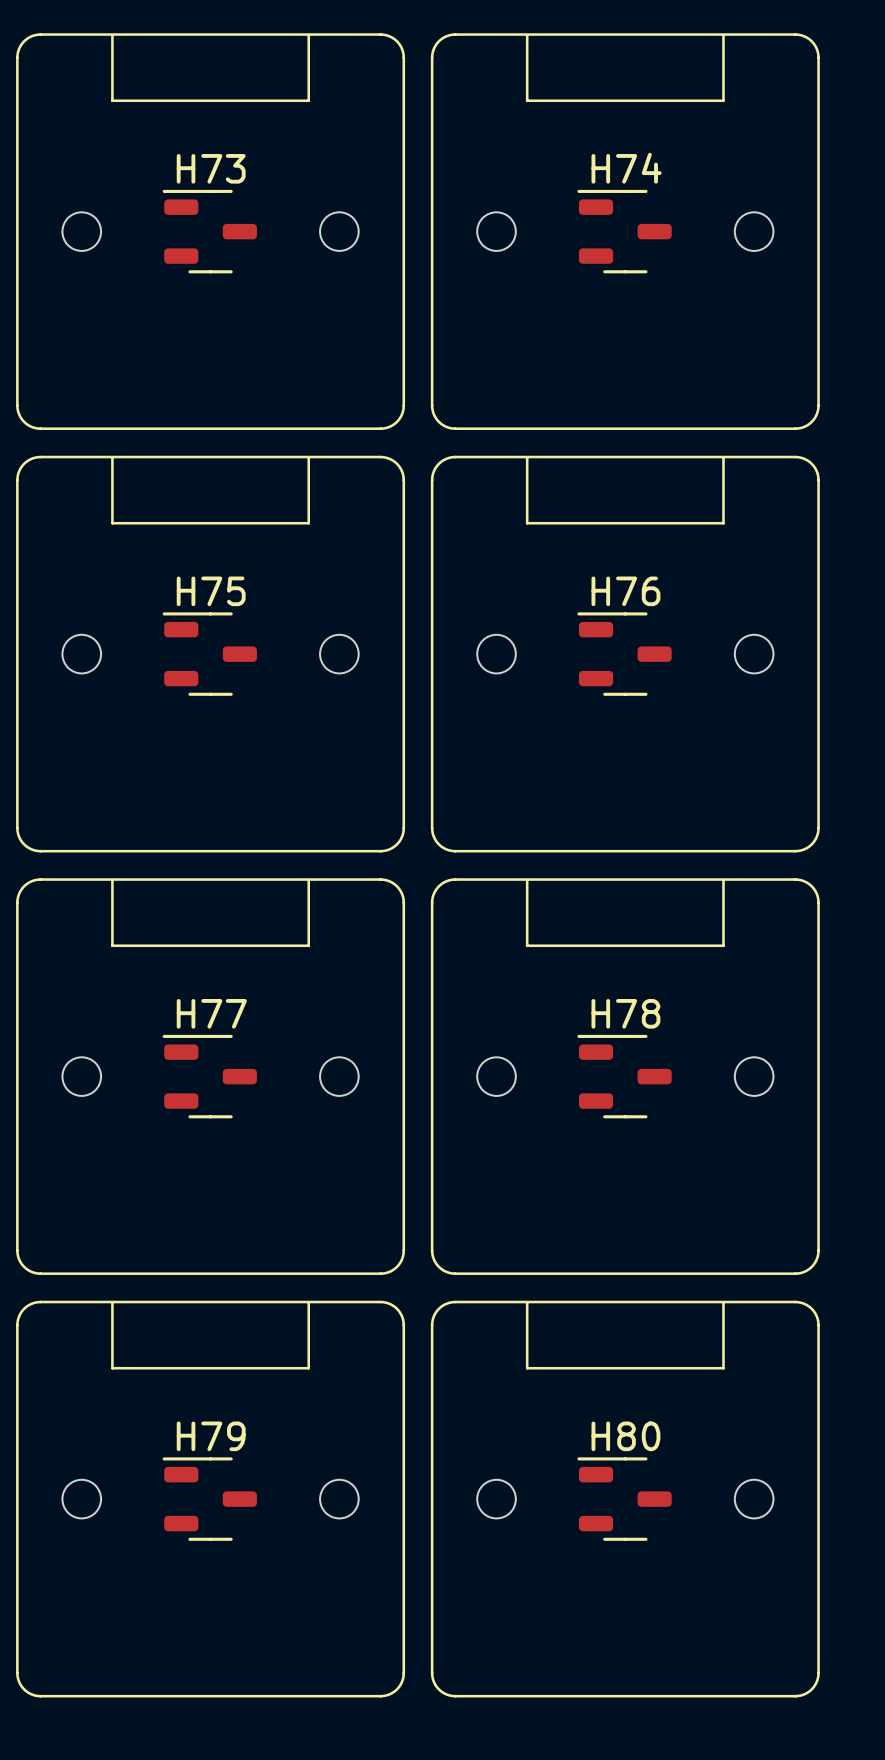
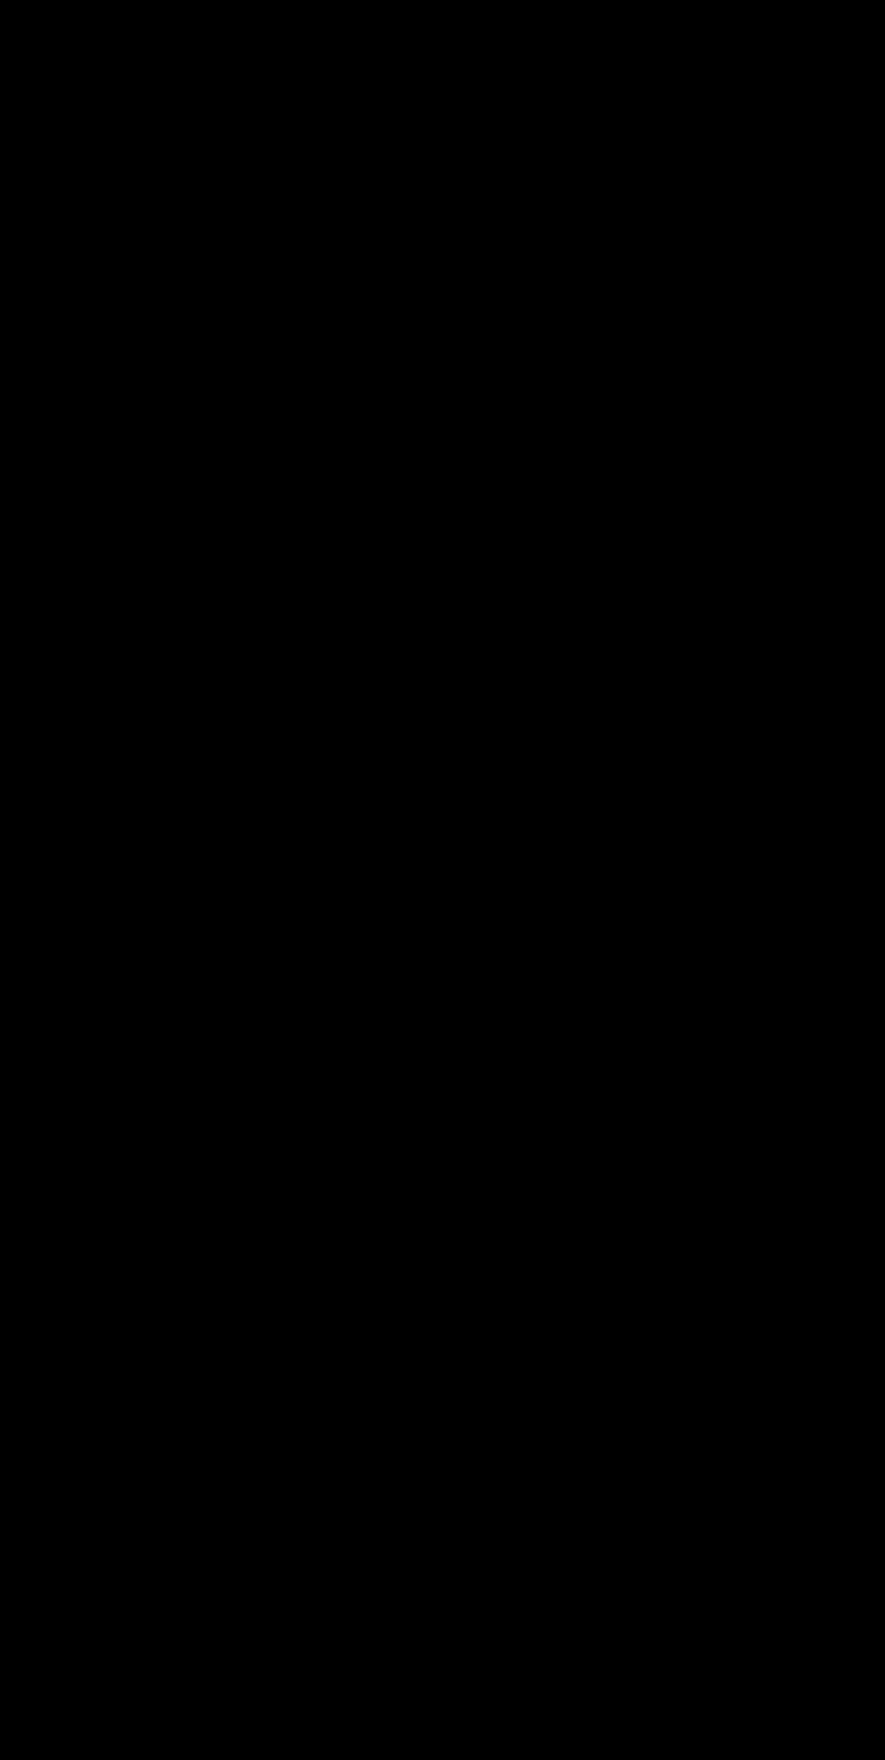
H73: (210, 231) -> none
H74: (625, 231) -> none
H75: (210, 654) -> none
H76: (625, 654) -> none
H77: (210, 1076) -> none
H78: (625, 1076) -> none
H79: (210, 1499) -> none
H80: (625, 1499) -> none

